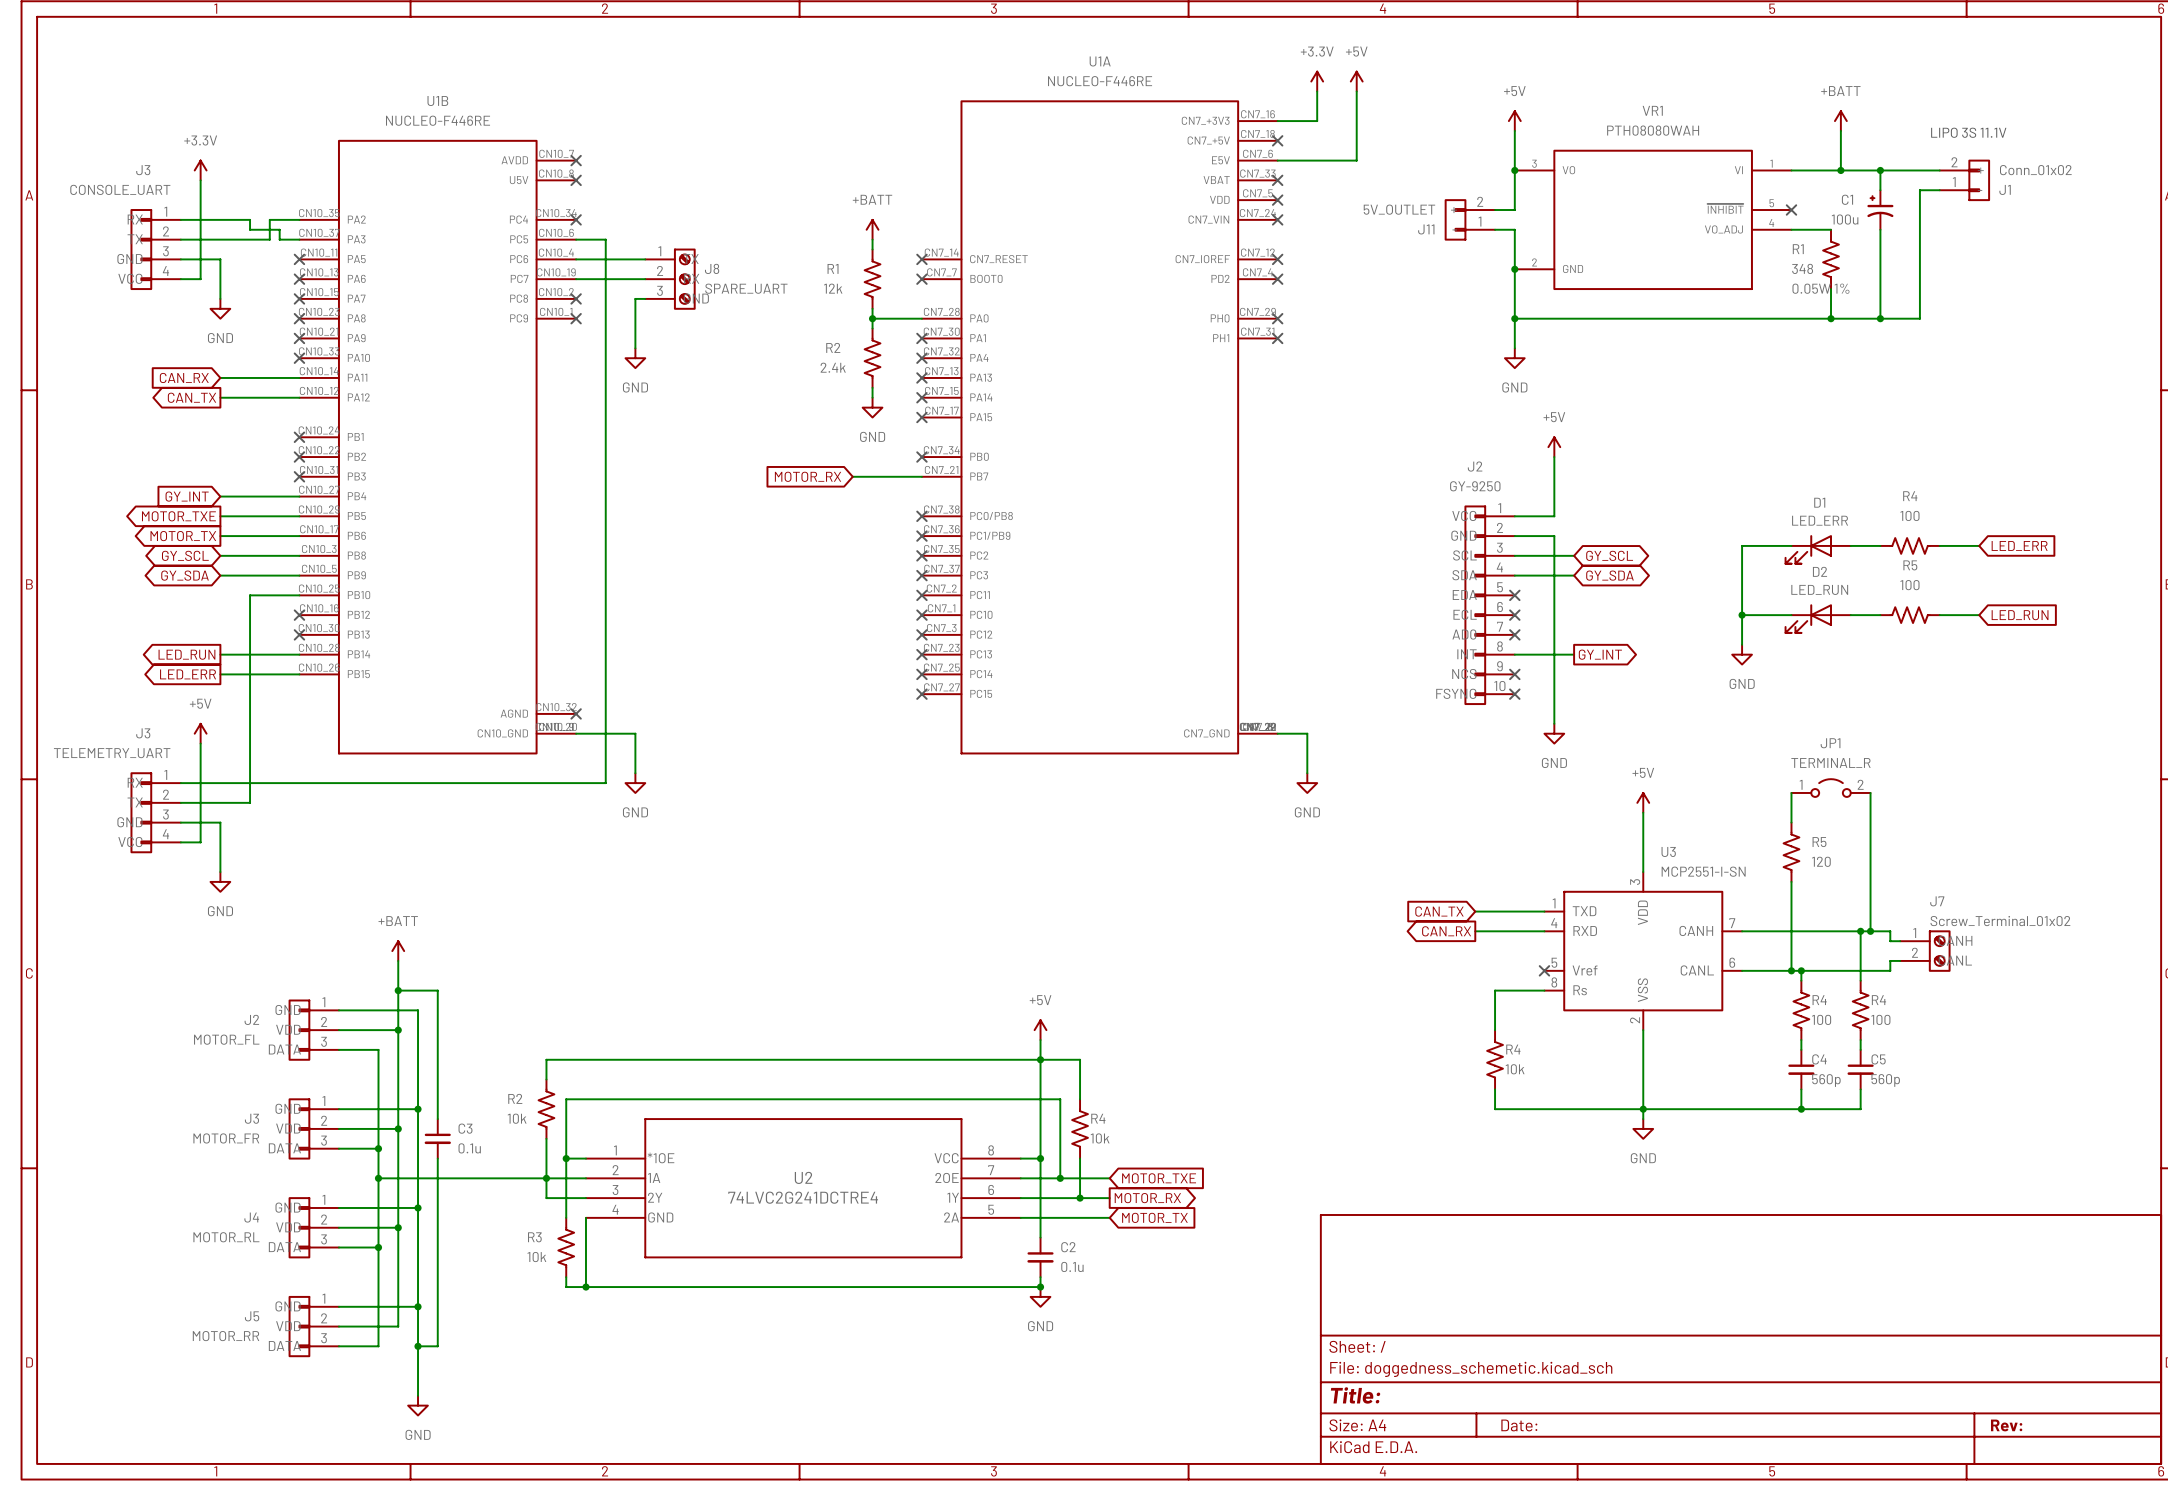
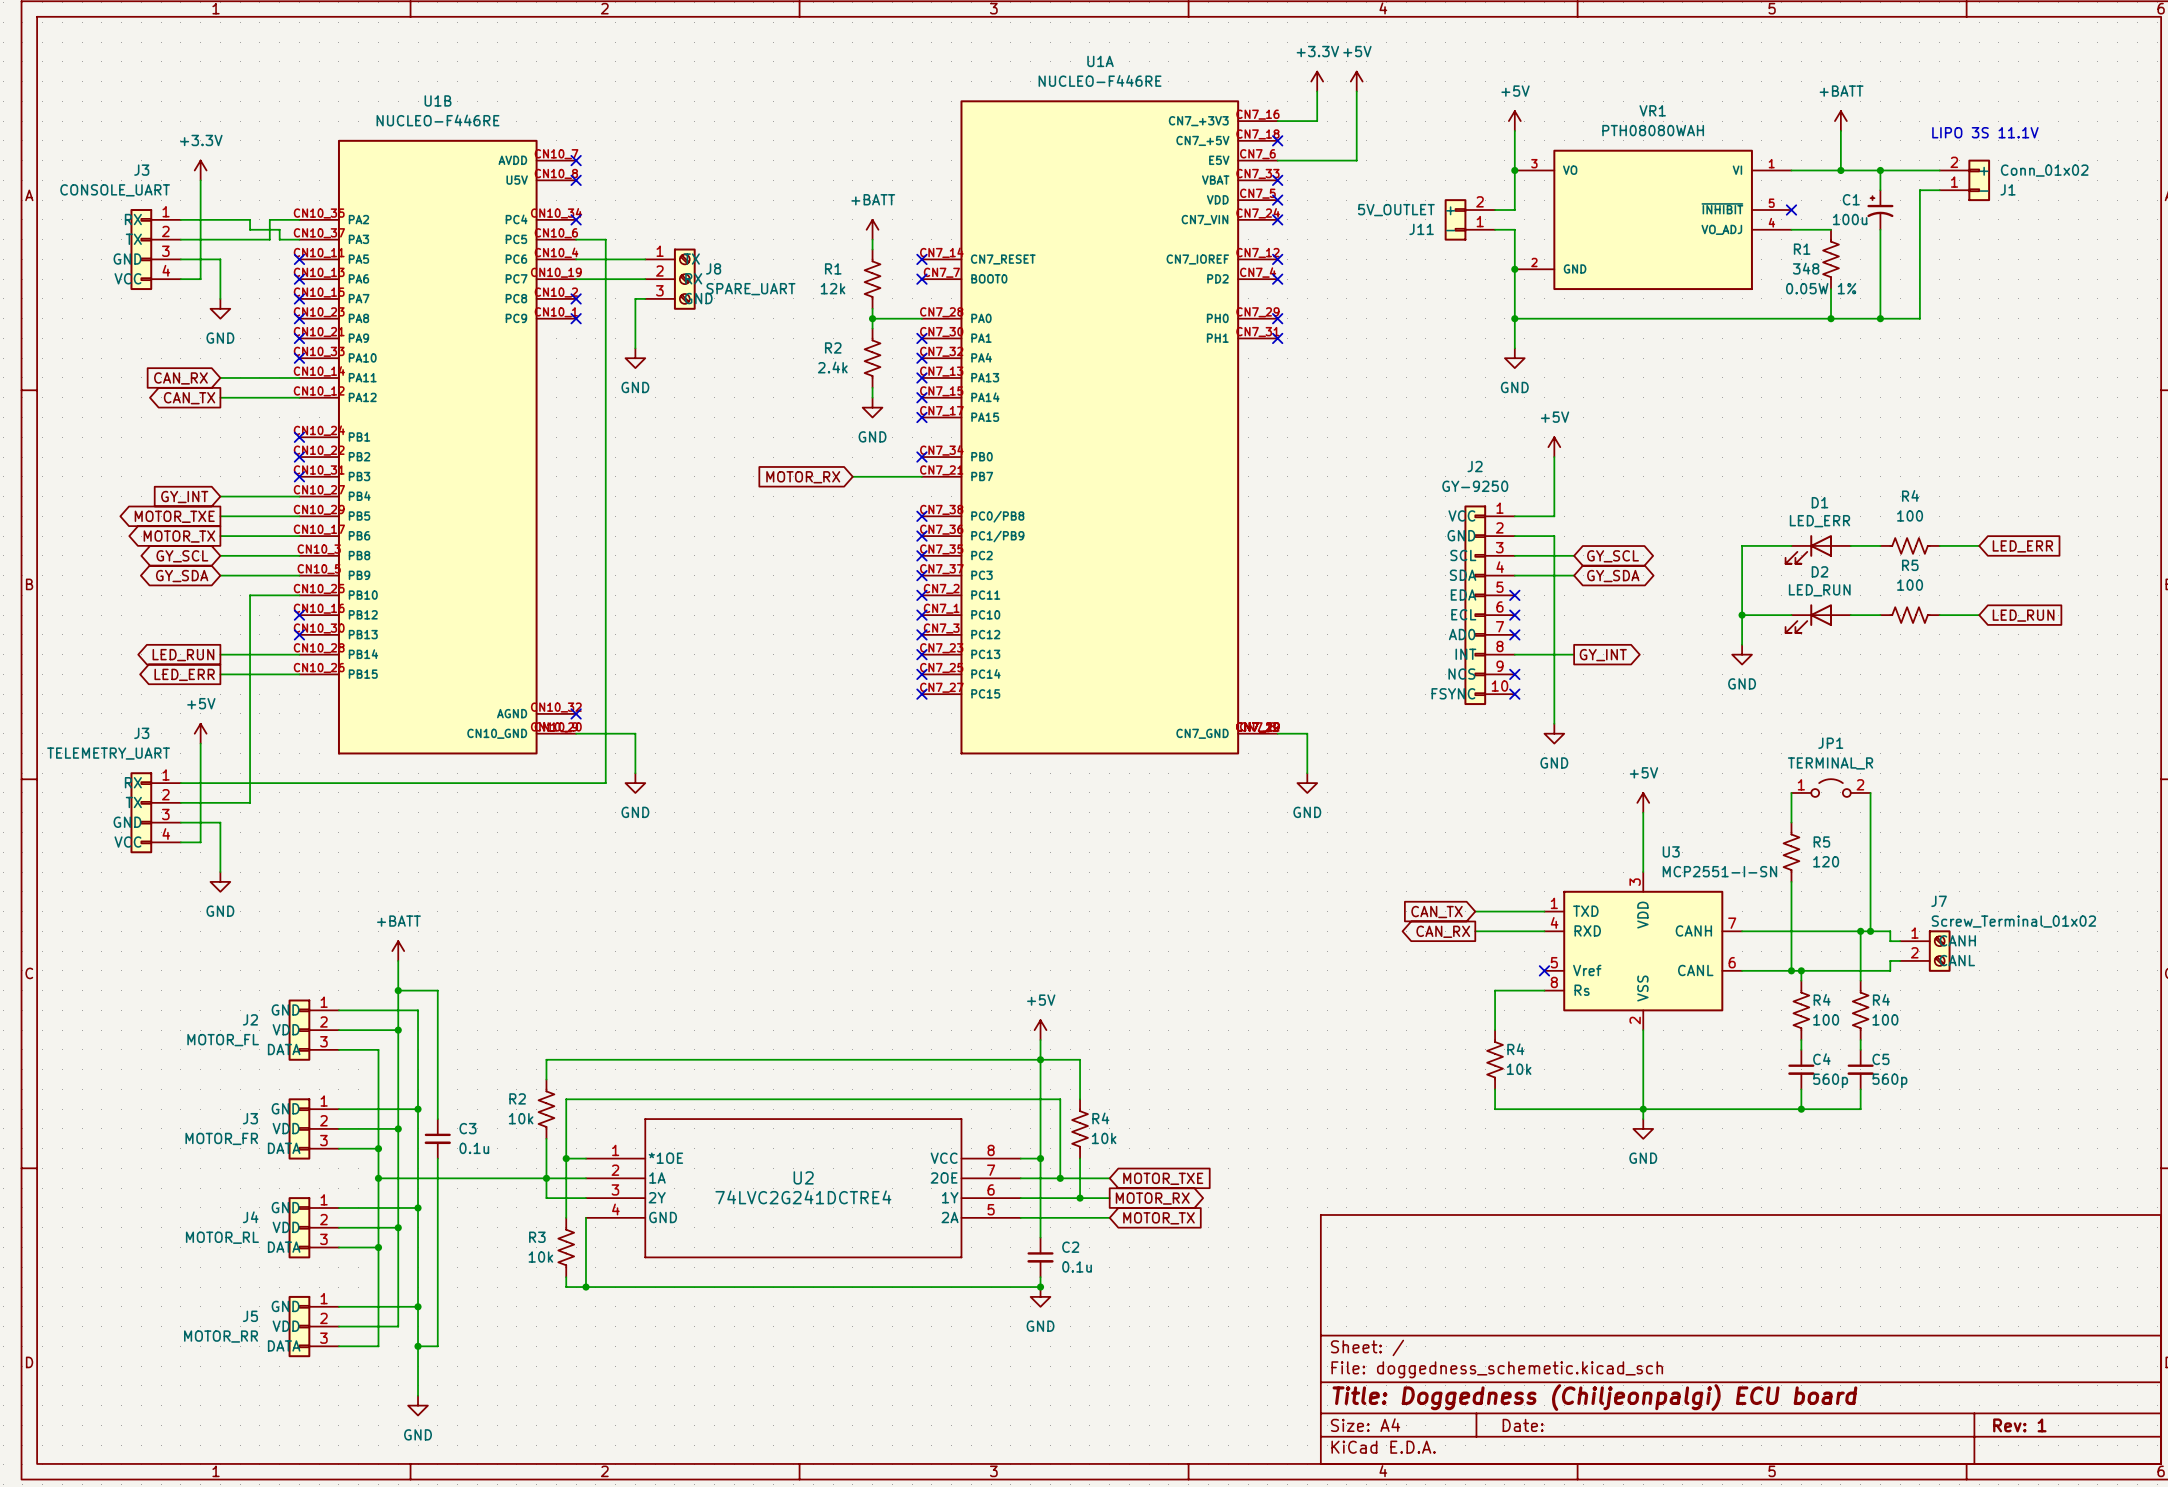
title block: Title: (1355, 1395) -> Title: Doggedness (Chiljeonpalgi) ECU board (1594, 1397)
title block: Rev: (2006, 1425) -> Rev: 1 (2019, 1425)

